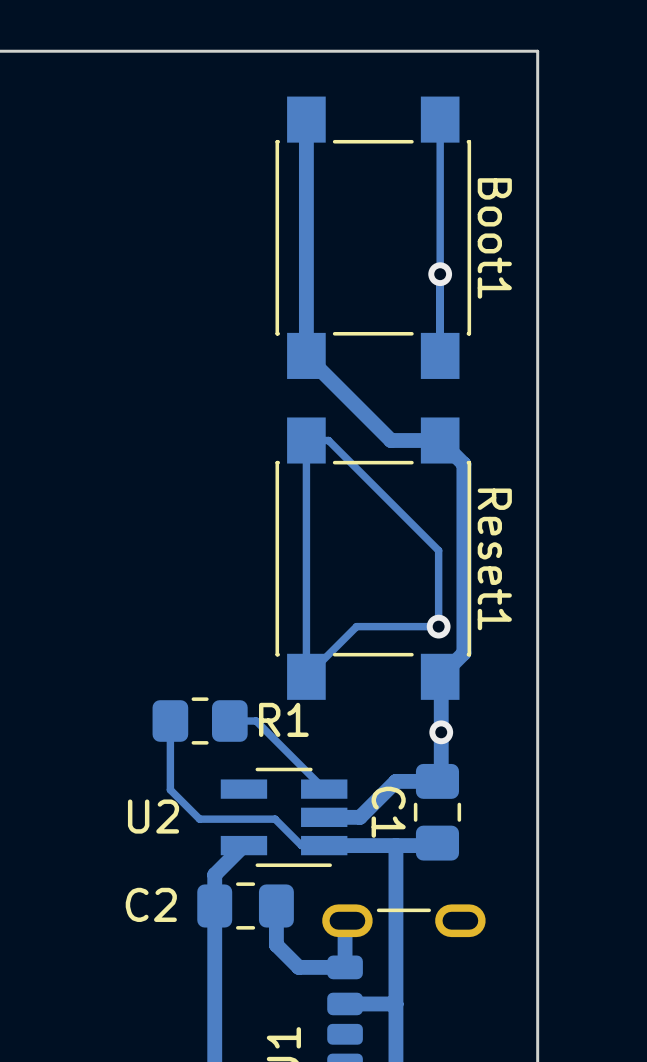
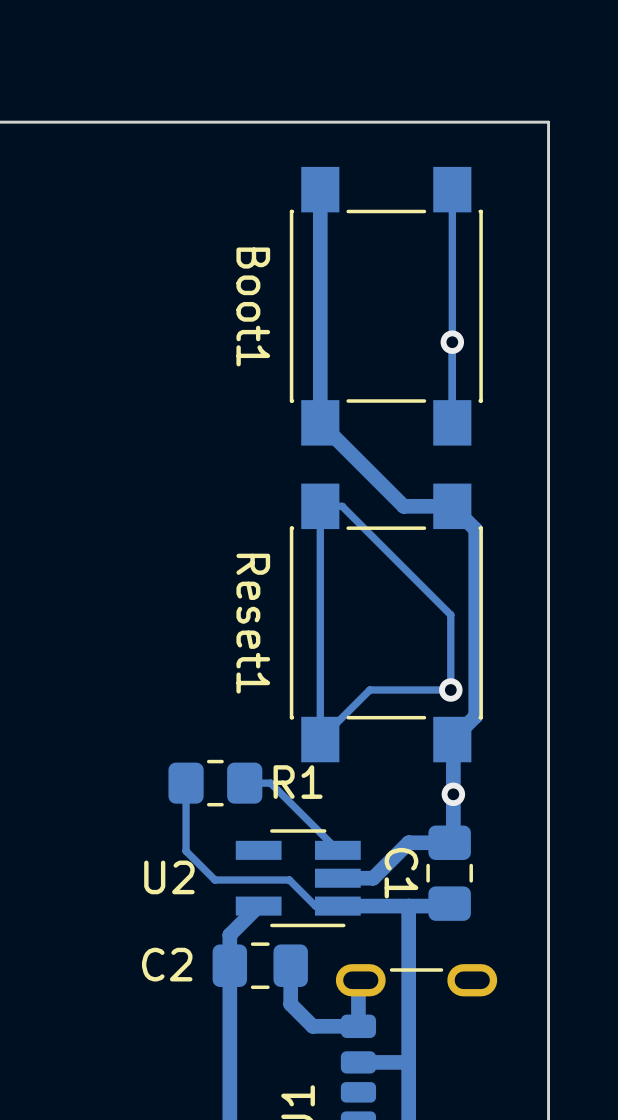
Boot1 name position: Boot1 (494, 238) -> Boot1 (253, 306)
Reset1 name position: Reset1 (494, 559) -> Reset1 (253, 623)

